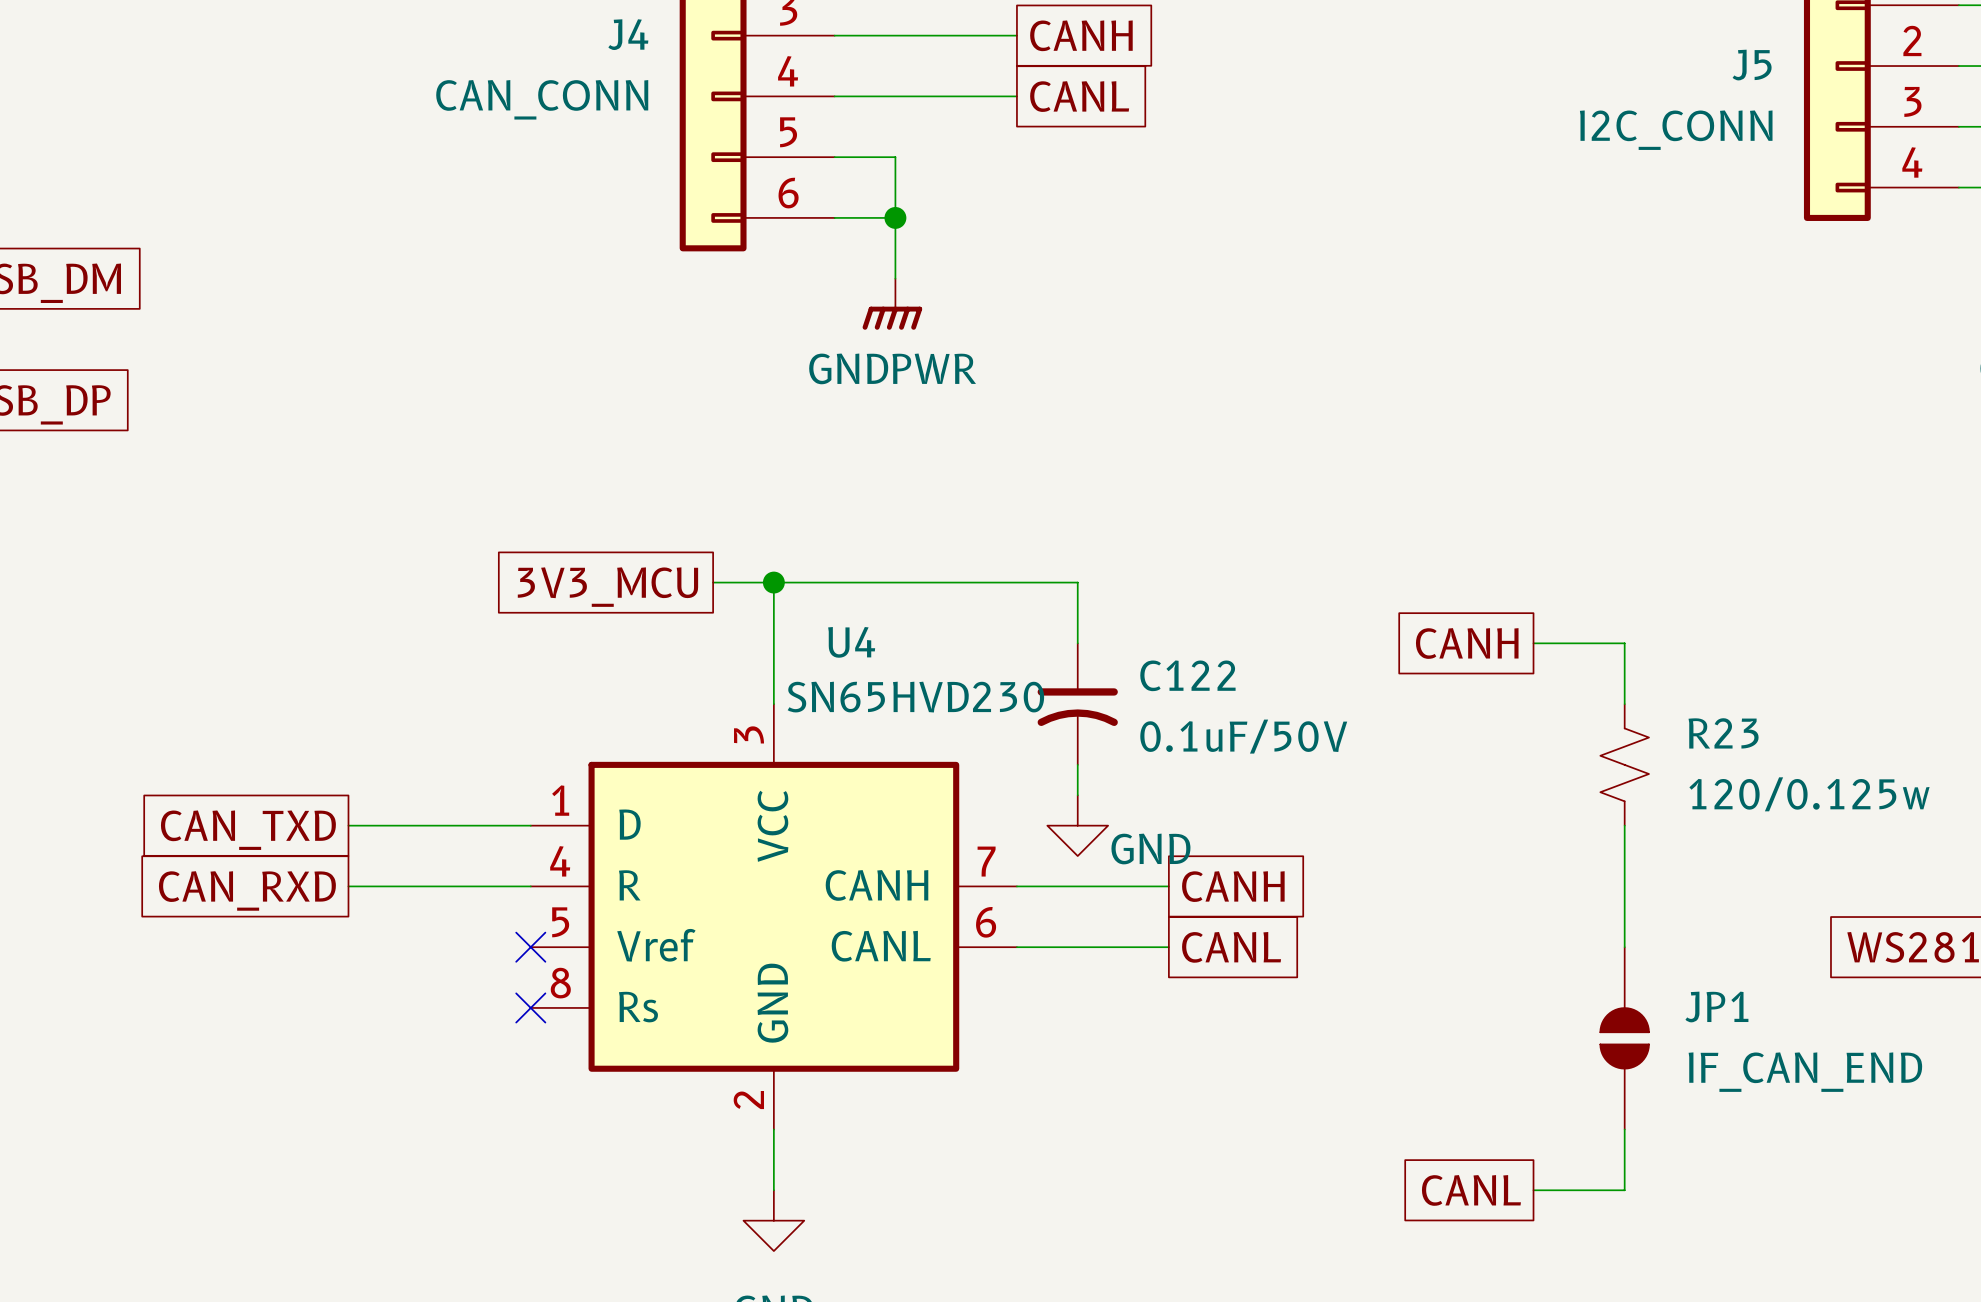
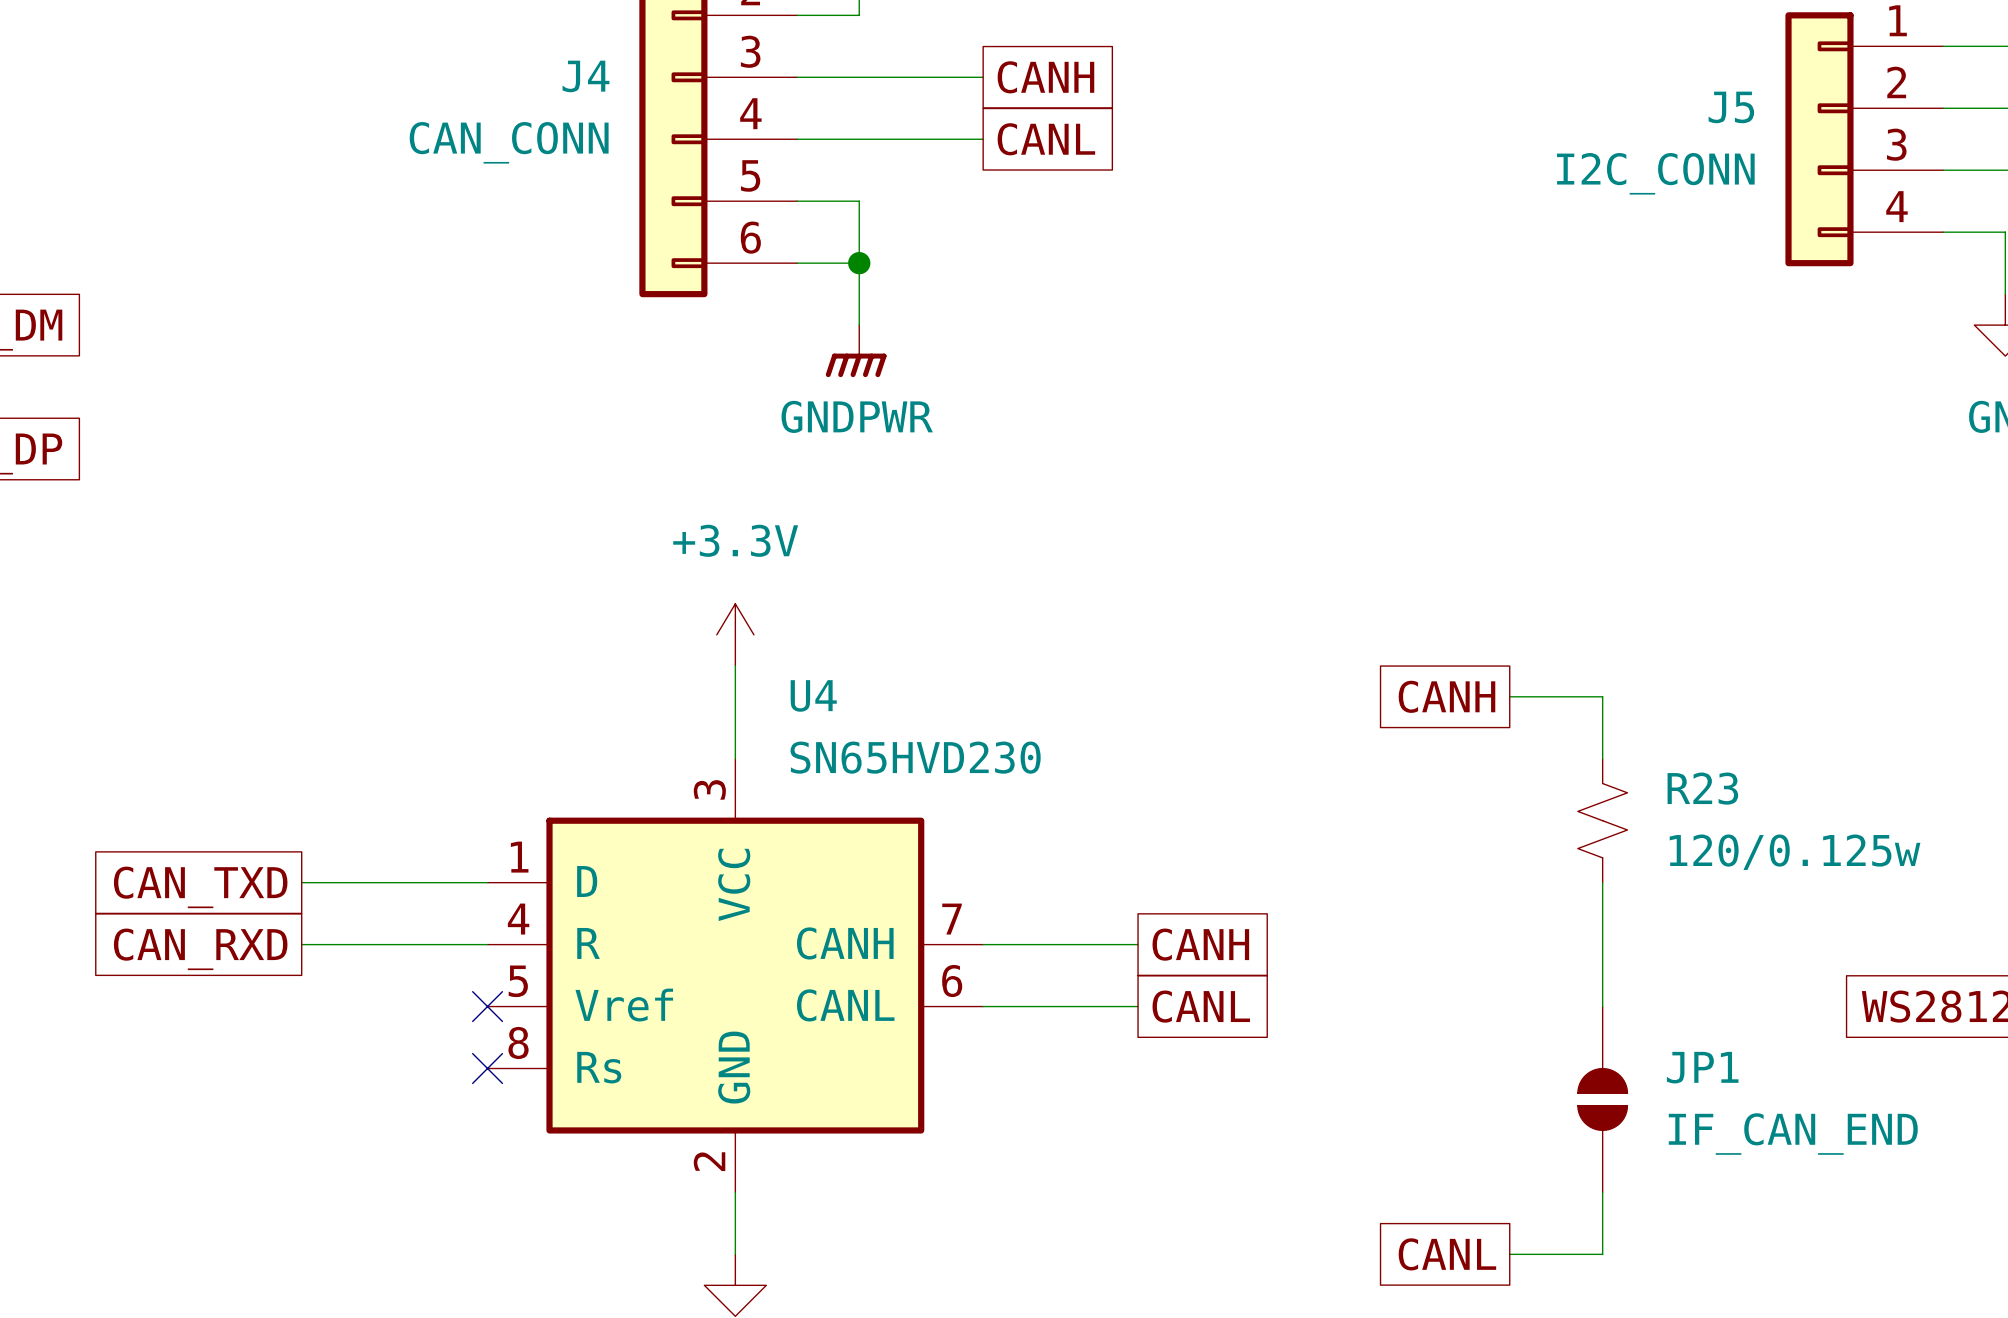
wire: (713, 582) (1077, 582) (1077, 643) -> none
junction: (773, 582) -> none
power symbol: none -> +3.3V (735, 634)
global label: 3V3_MCU (607, 587) -> none
U4 value position: SN65HVD230 (915, 697) -> SN65HVD230 (915, 757)
C122: 0.1uF/50V (1077, 704) -> none
wire: (1077, 764) (1077, 795) -> none
power symbol: GND (1077, 825) -> none

